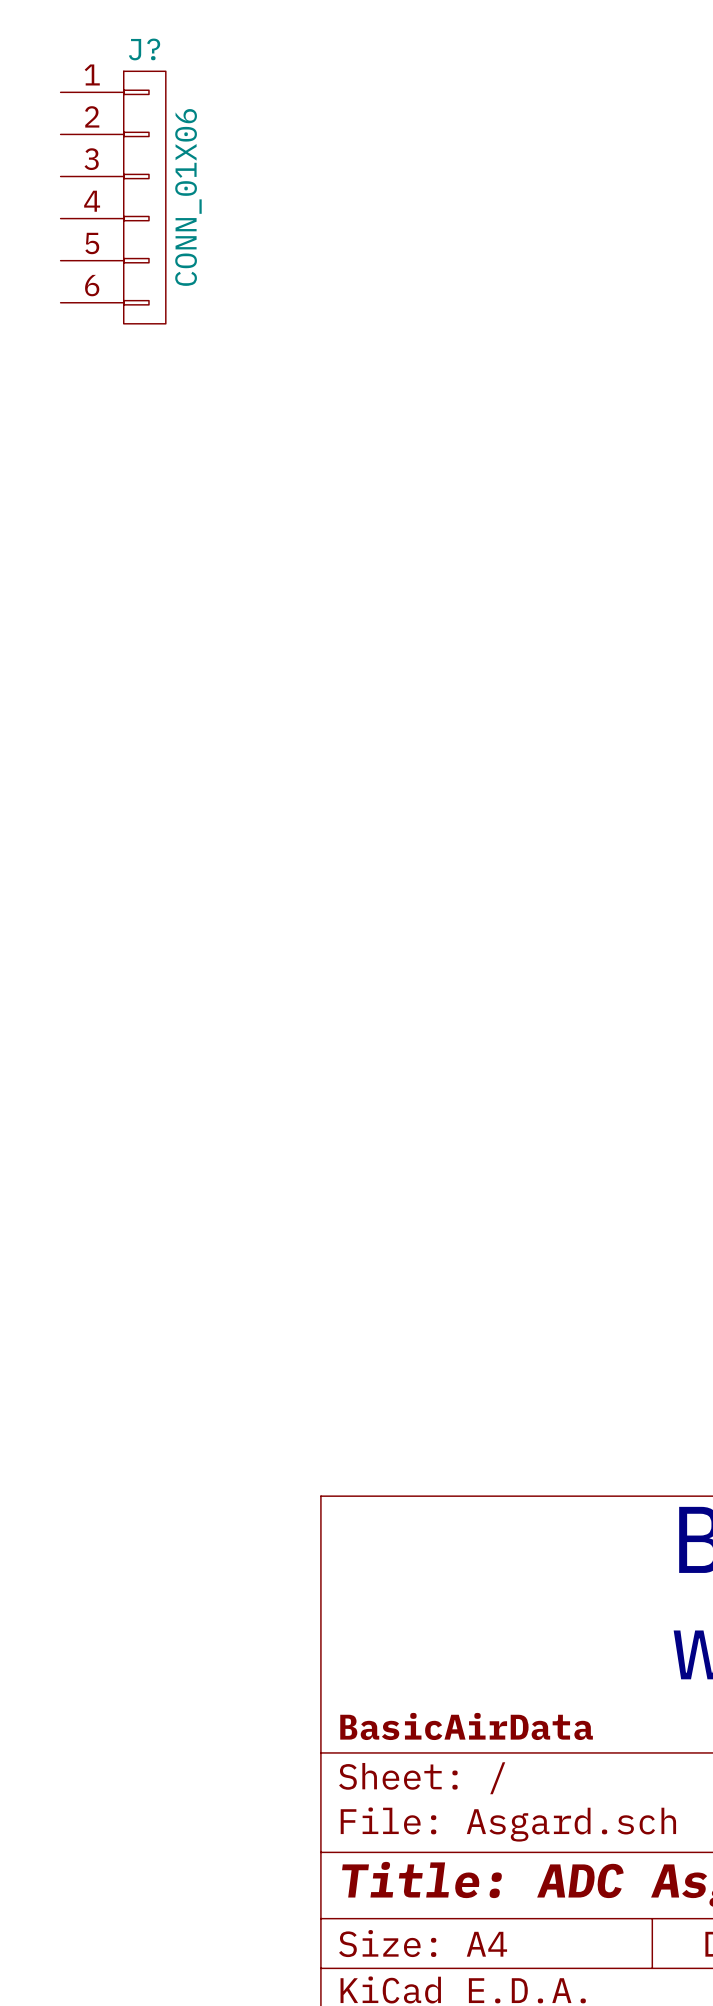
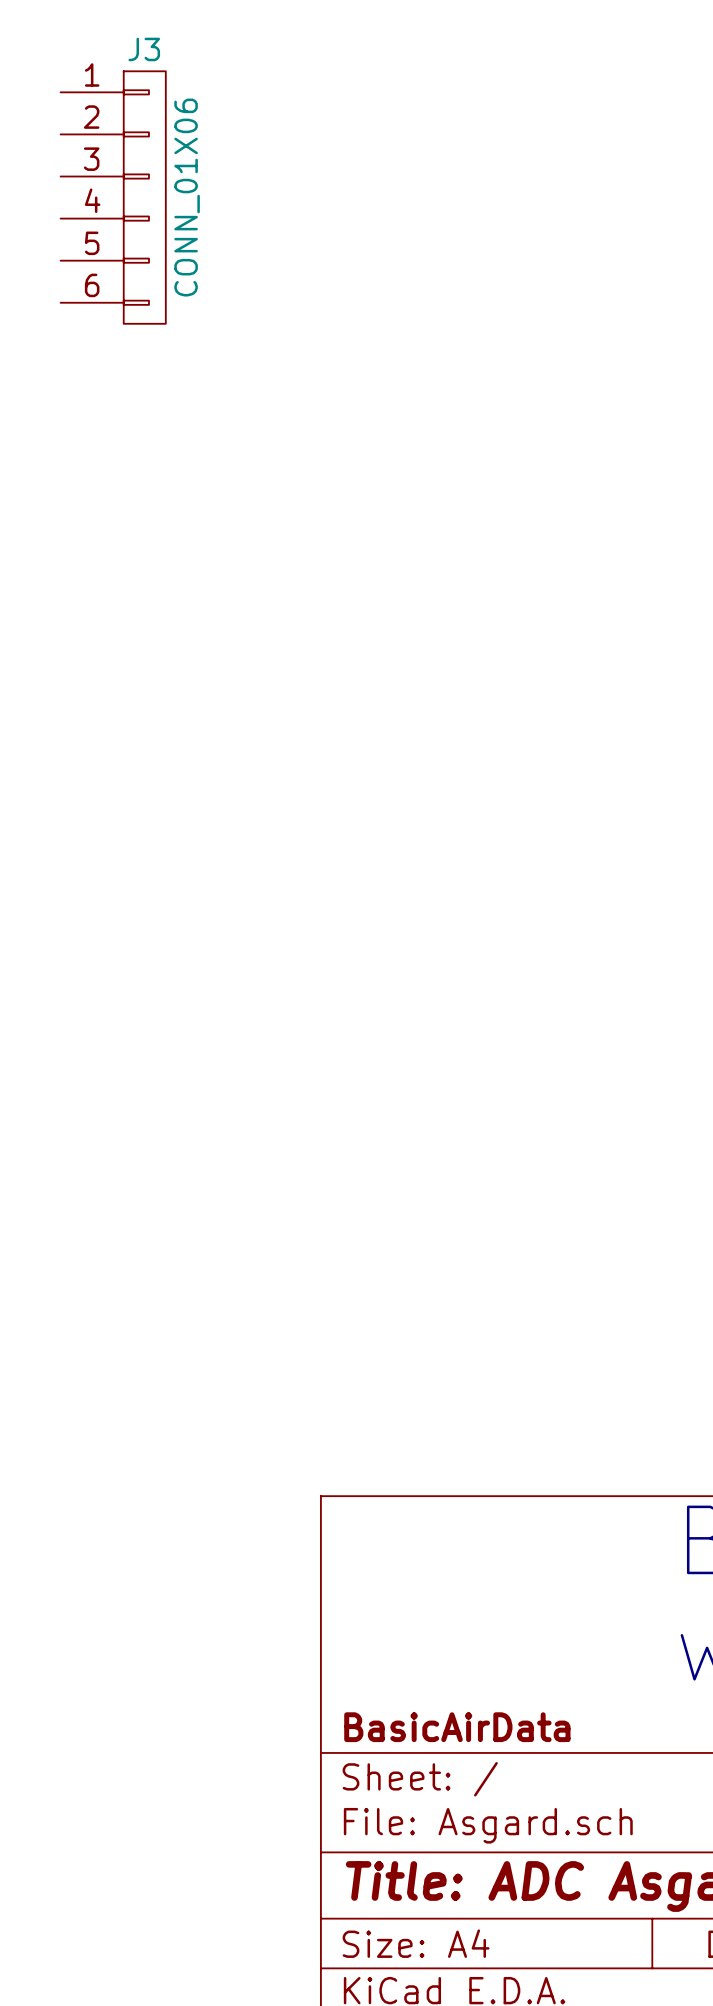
J? name: J? (144, 49) -> J3 (144, 49)

